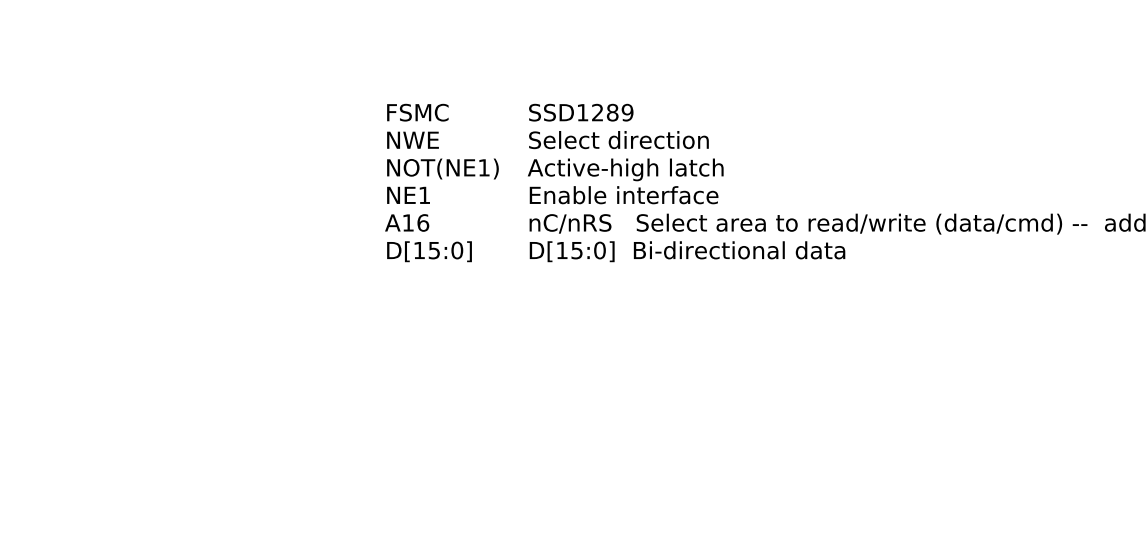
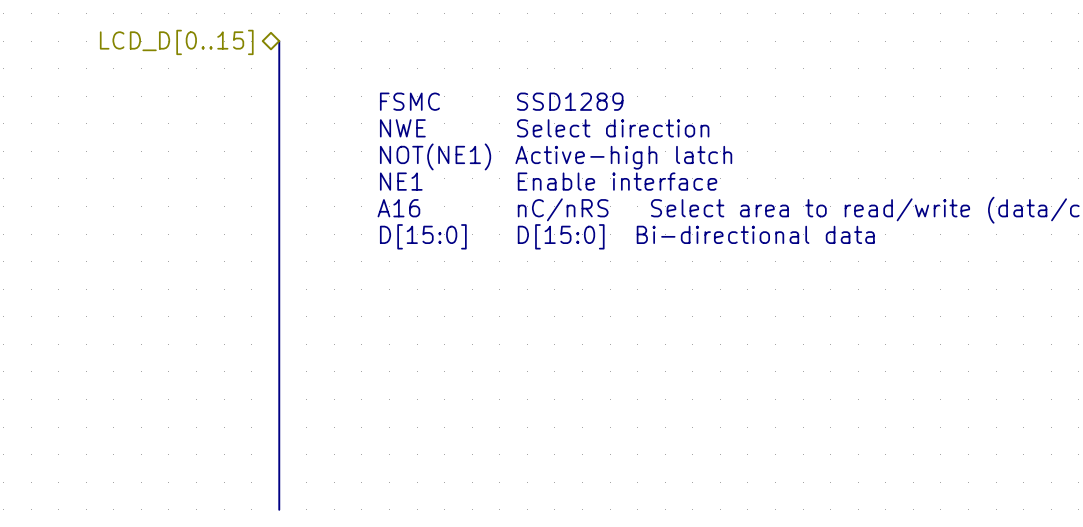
bus: none -> (279, 41) (279, 509)
hierarchical label: none -> LCD_D[0..15] (176, 42)

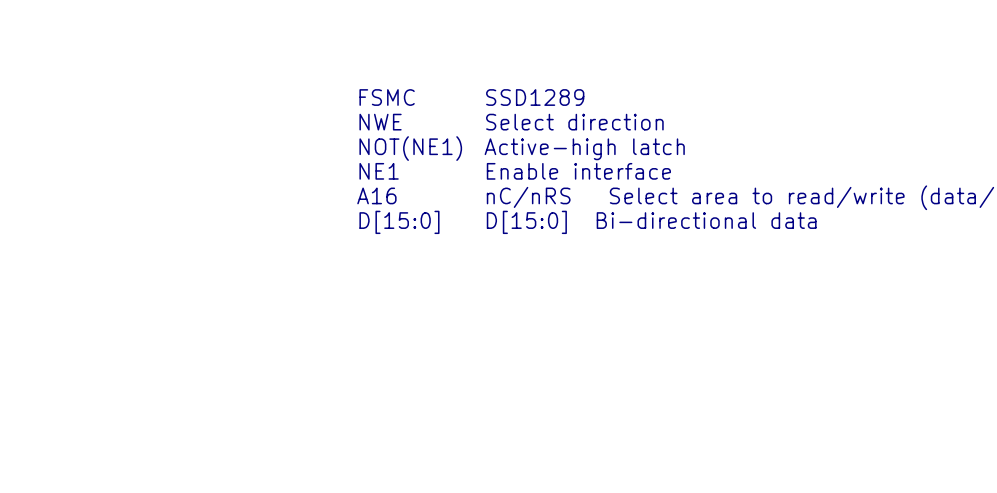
bus: (279, 41) (279, 509) -> none
hierarchical label: LCD_D[0..15] (176, 42) -> none

